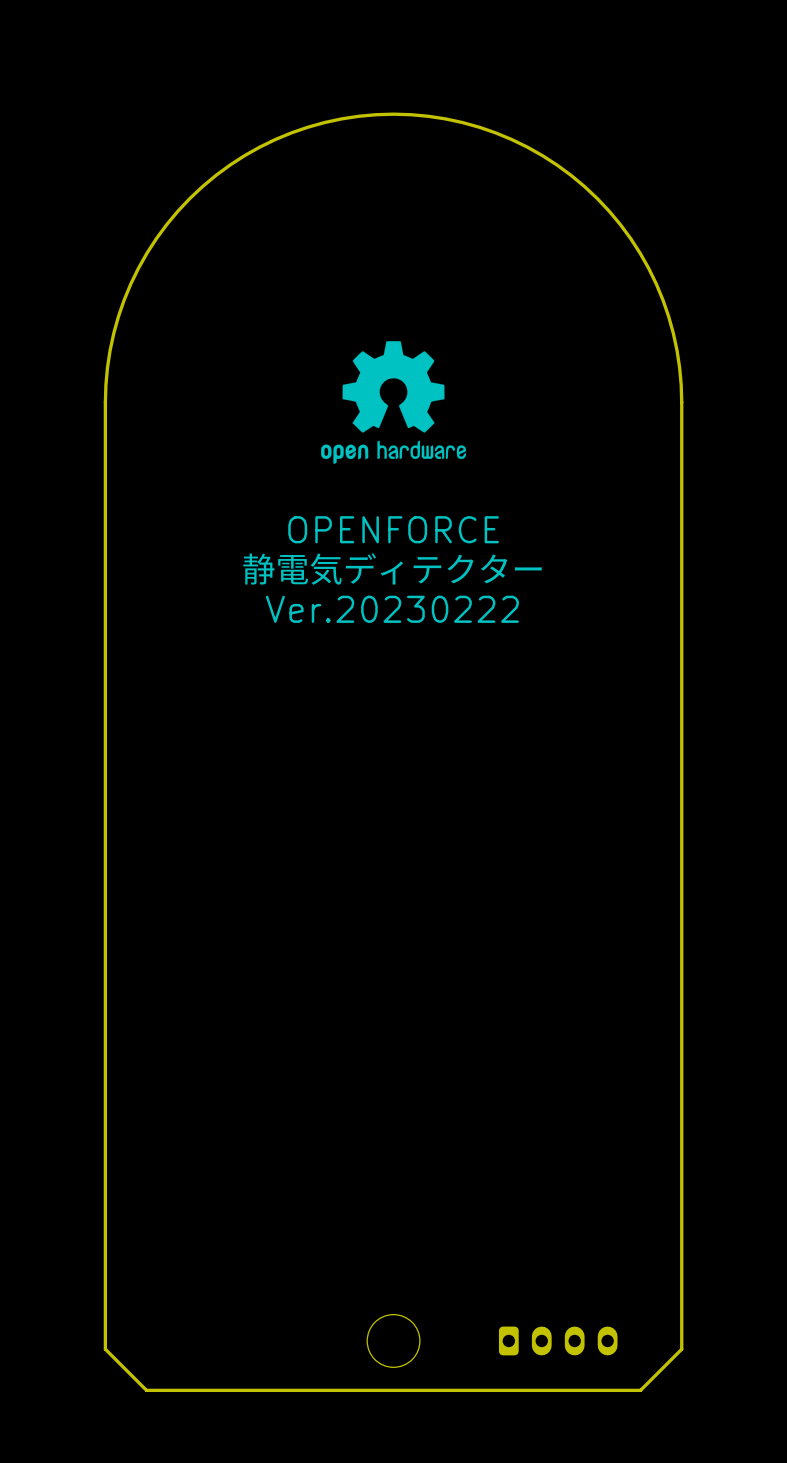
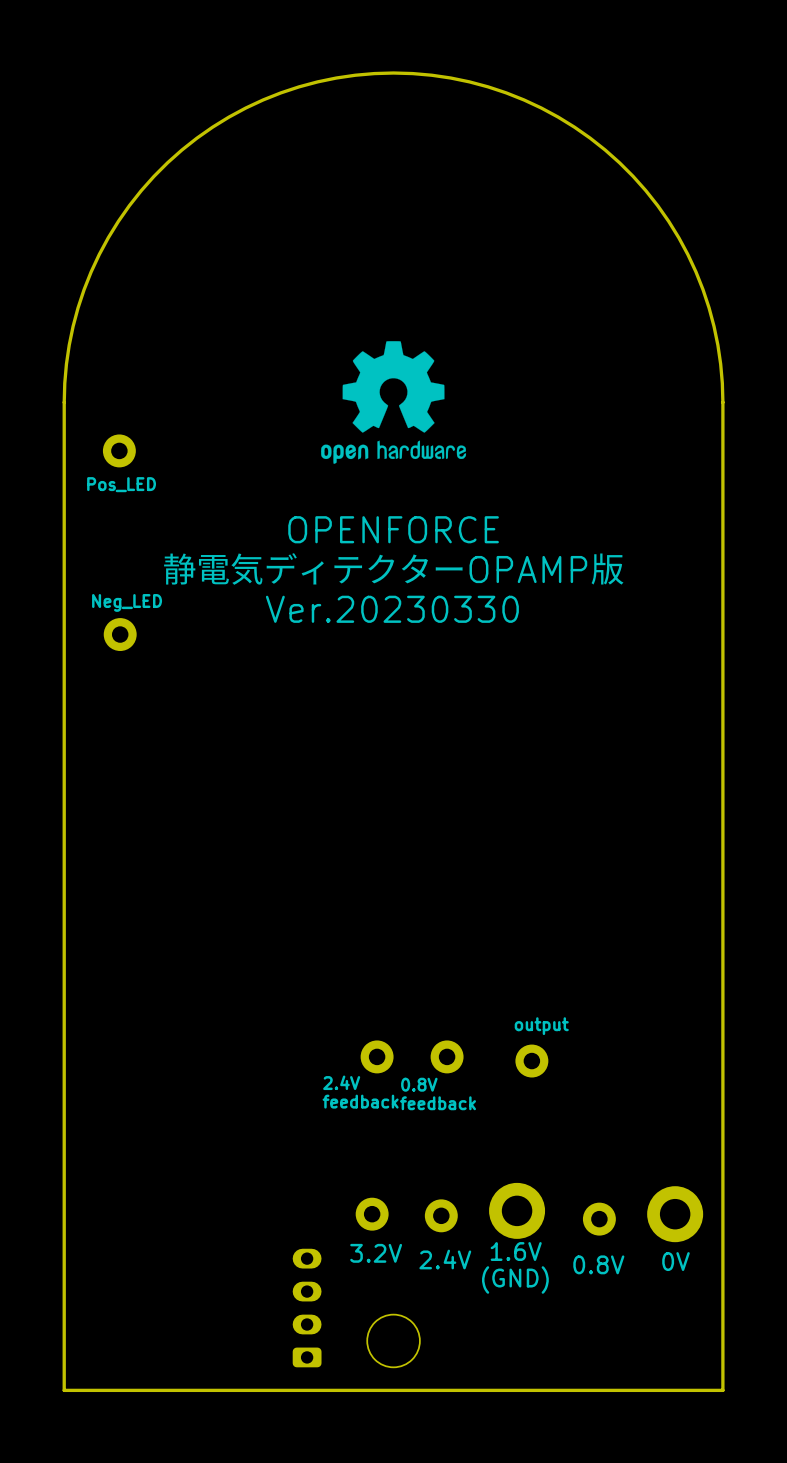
part: none -> (119, 450)
text: none -> Pos_LED (121, 484)
text: 静電気ディテクター (392, 568) -> 静電気ディテクターOPAMP版 (393, 568)
text: none -> Neg_LED (127, 602)
text: Ver.20230222 (392, 609) -> Ver.20230330 (392, 609)
part: none -> (120, 634)
text: none -> output (541, 1026)
part: none -> (377, 1056)
part: none -> (447, 1056)
part: none -> (531, 1061)
text: none -> 2.4V (341, 1082)
text: none -> 0.8V (419, 1084)
text: none -> feedback (360, 1101)
text: none -> feedback (438, 1103)
part: none -> (517, 1210)
part: none -> (372, 1214)
part: none -> (675, 1214)
part: none -> (441, 1215)
part: none -> (599, 1219)
text: none -> 1.6V (516, 1251)
text: none -> 3.2V (376, 1253)
text: none -> 2.4V (445, 1259)
text: none -> 0V (675, 1261)
text: none -> 0.8V (598, 1264)
text: none -> (GND) (515, 1279)
part rotation: 0° (558, 1340) -> 90° counterclockwise (307, 1308)
part position: (558, 1340) -> (307, 1308)
board edge: (640, 1390) (681, 1349) (681, 402) (677, 350) (663, 300) (640, 253) (609, 211) (571, 175) (542, 155) (495, 132) (445, 118) (393, 114) (341, 118) (291, 132) (244, 155) (215, 175) (177, 211) (146, 253) (124, 300) (110, 350) (105, 402) (105, 1349) (146, 1390) -> (640, 1390) (722, 1390) (722, 402) (717, 345) (703, 289) (678, 237) (645, 190) (605, 150) (558, 117) (506, 92) (450, 78) (393, 73) (336, 78) (280, 92) (228, 117) (181, 150) (141, 190) (108, 237) (84, 289) (69, 345) (64, 402) (64, 1390) (146, 1390)

